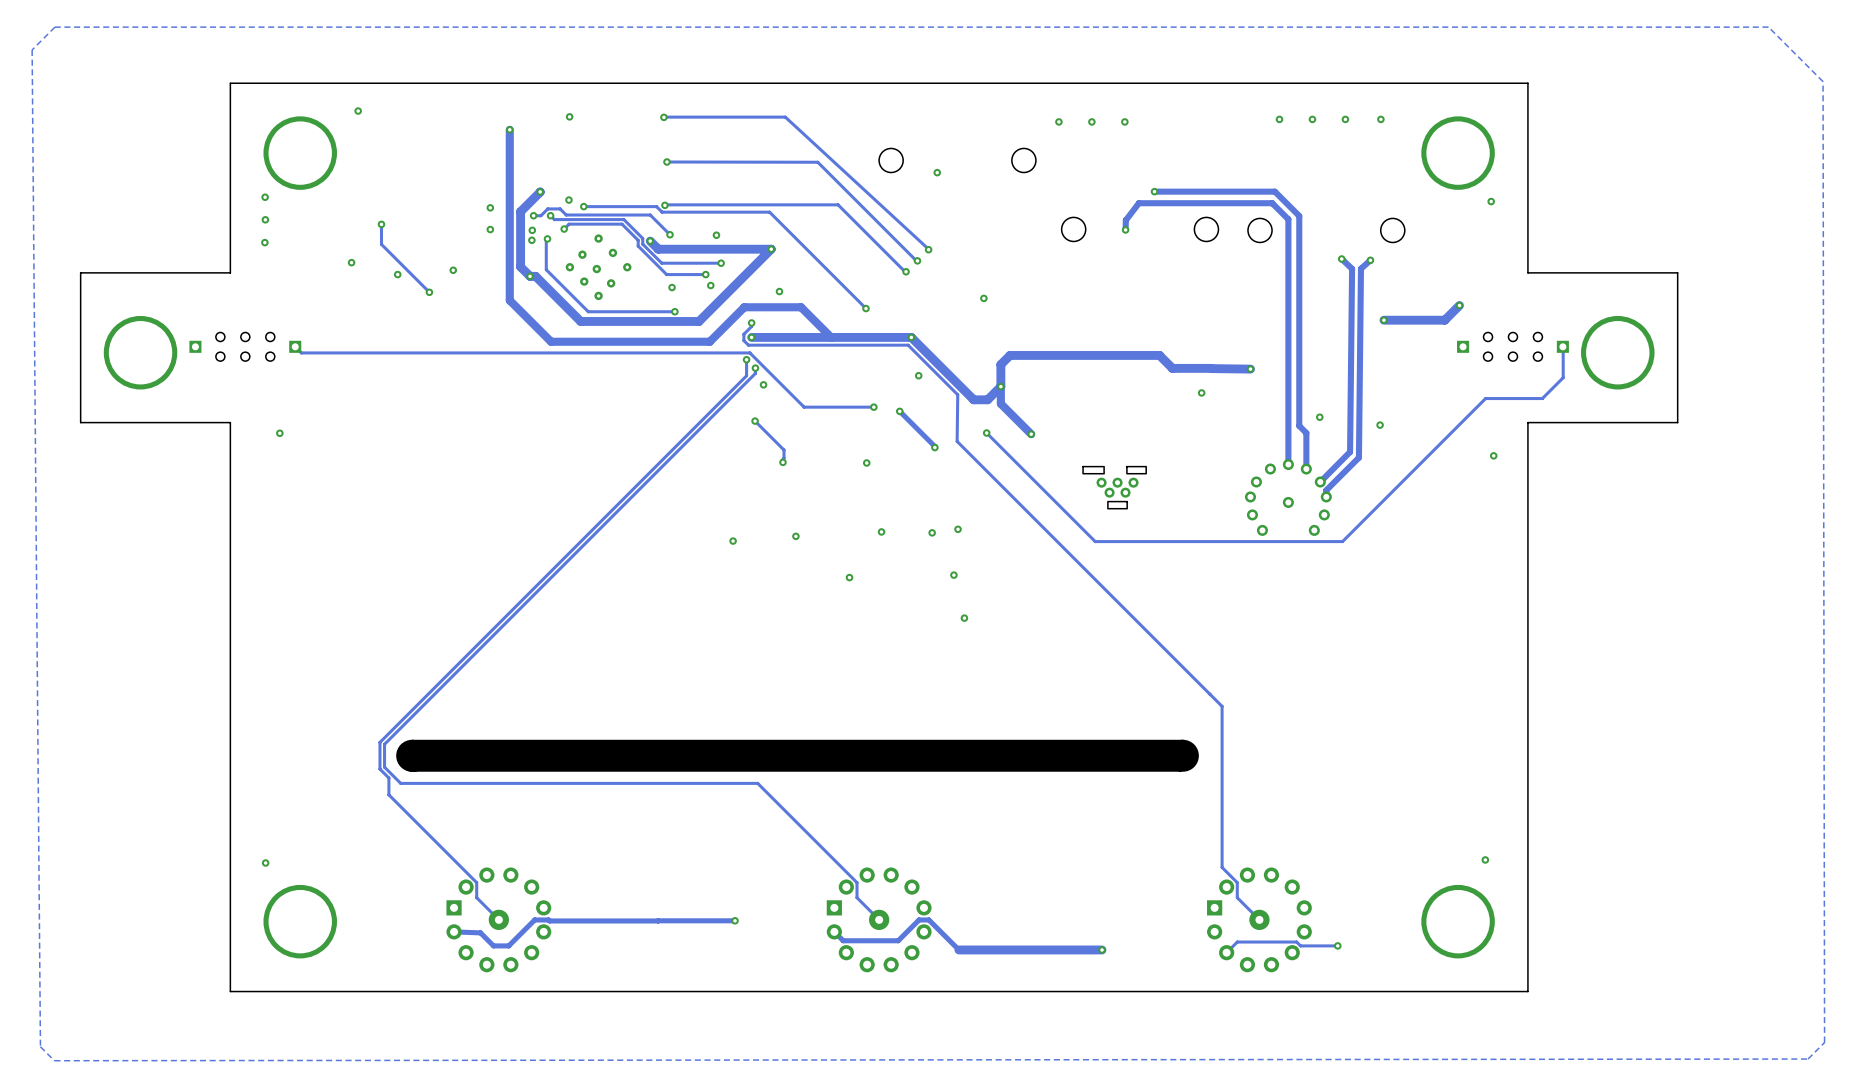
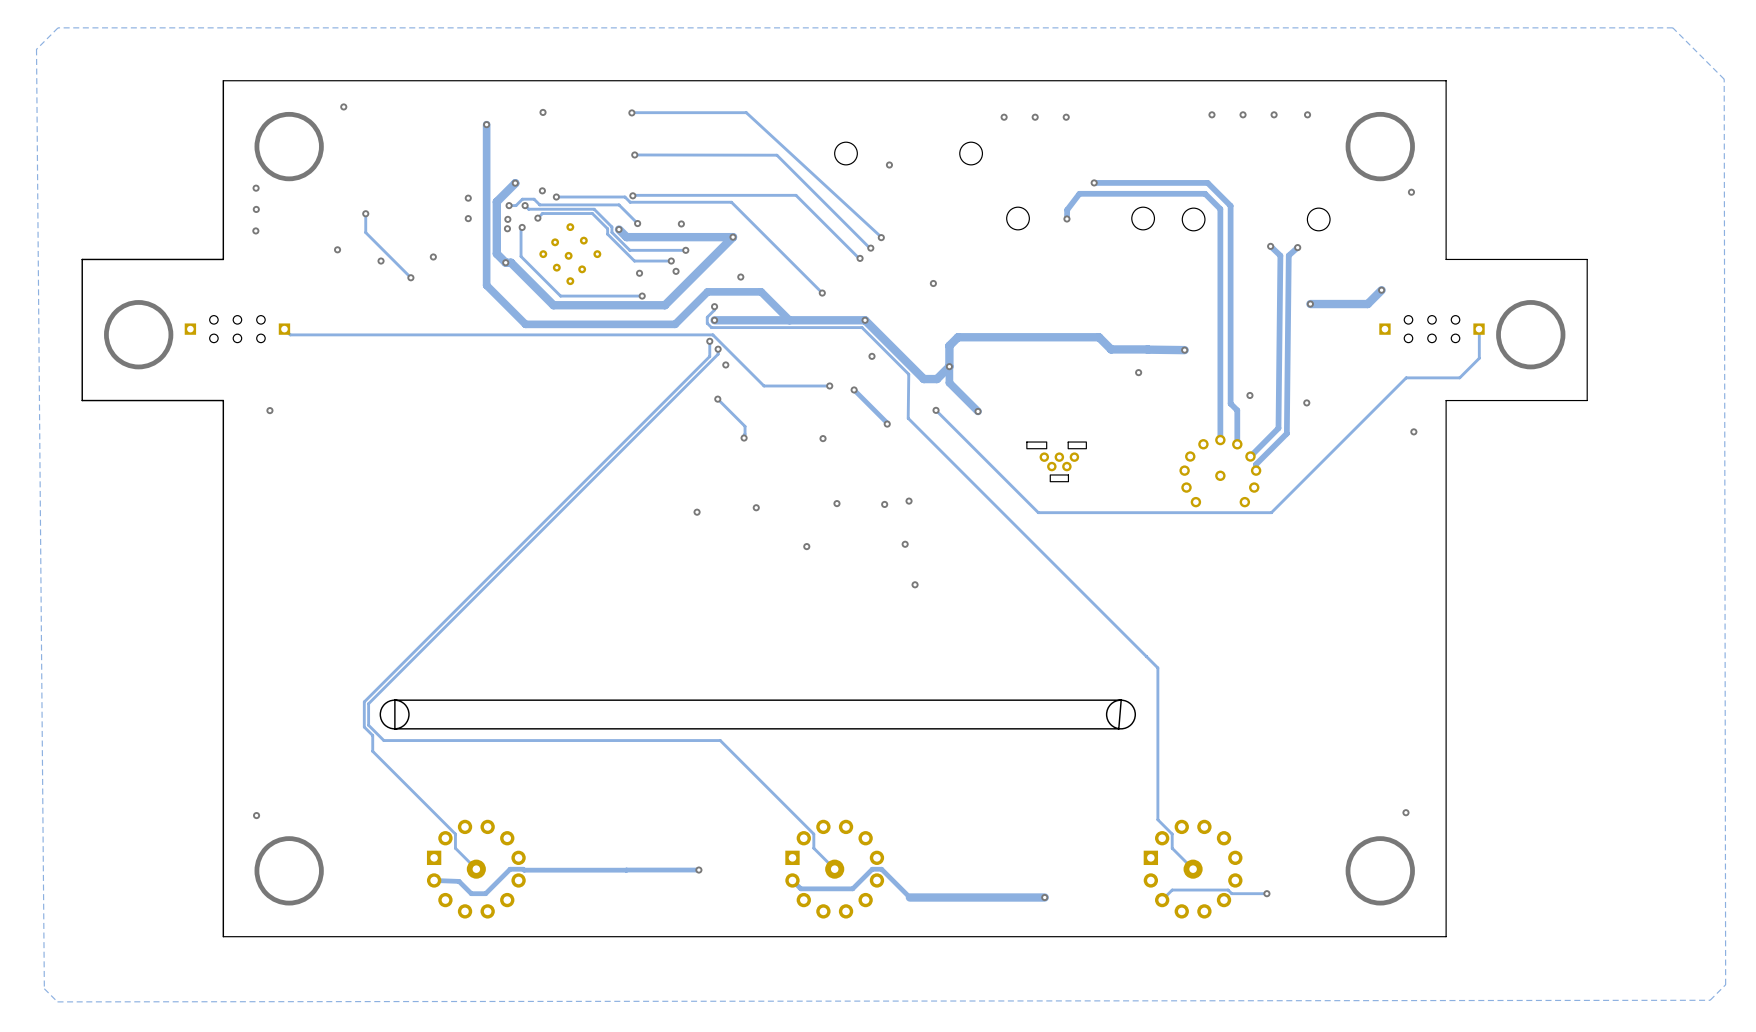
board edge: (1182, 755) (412, 756) -> none

